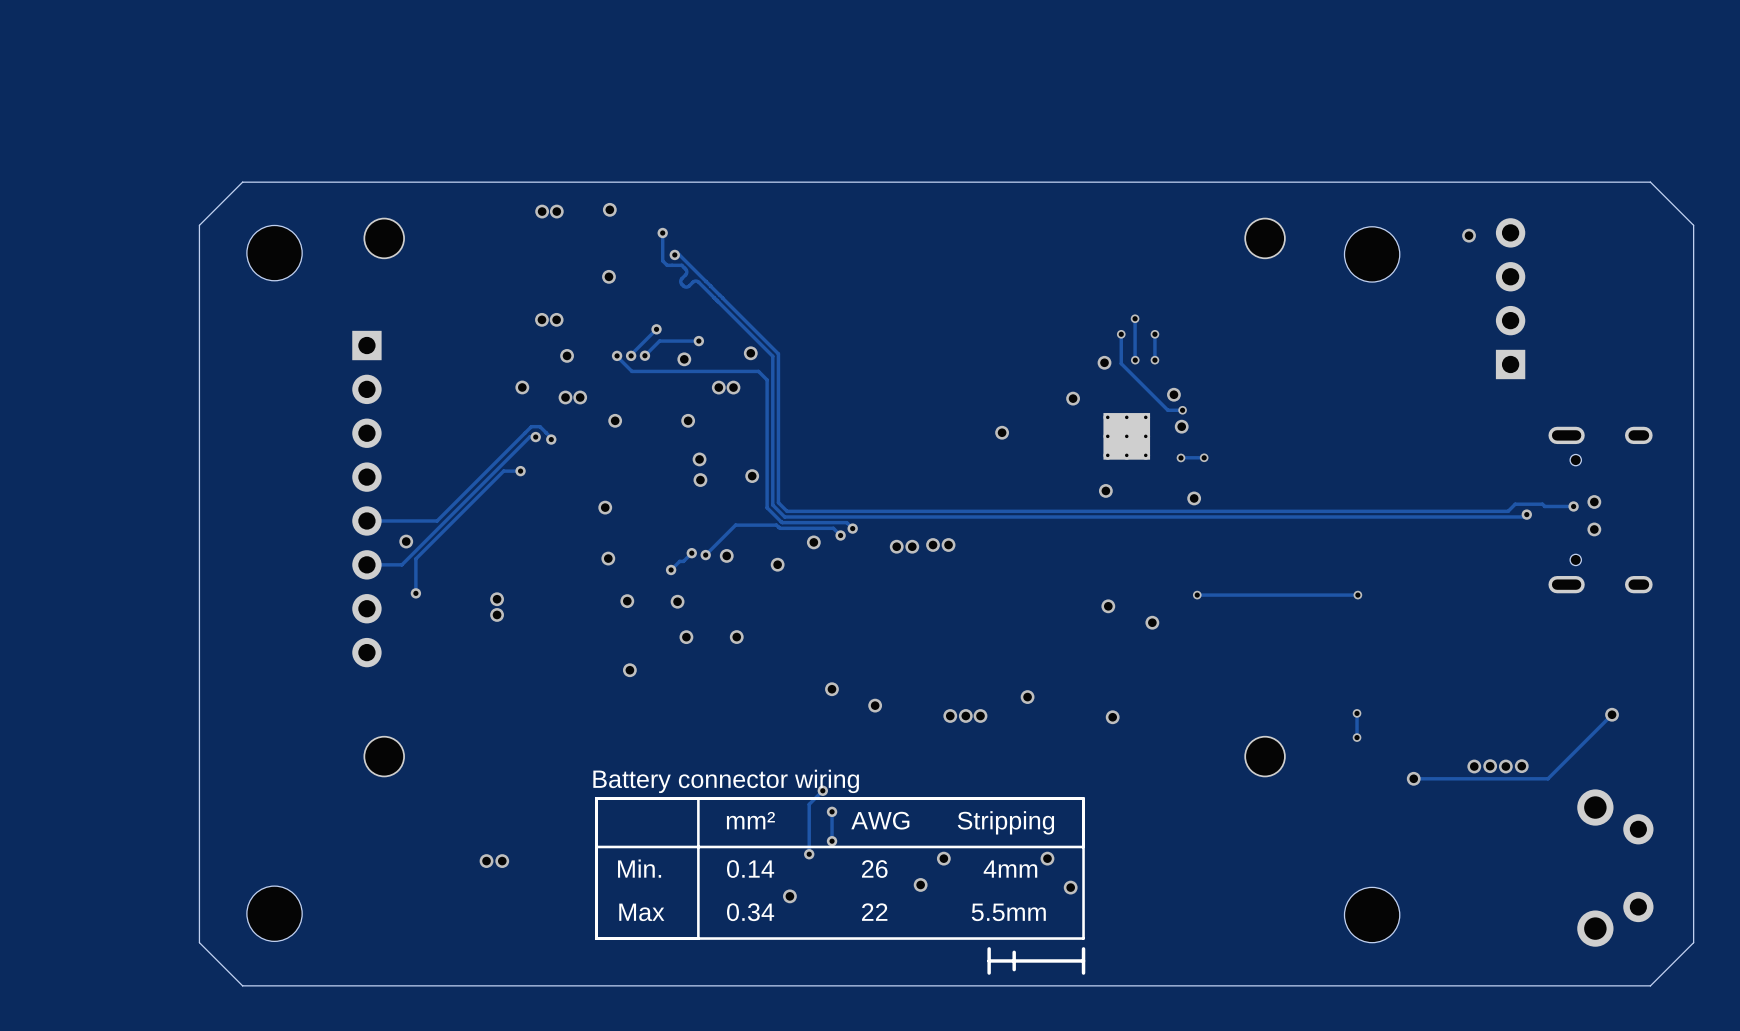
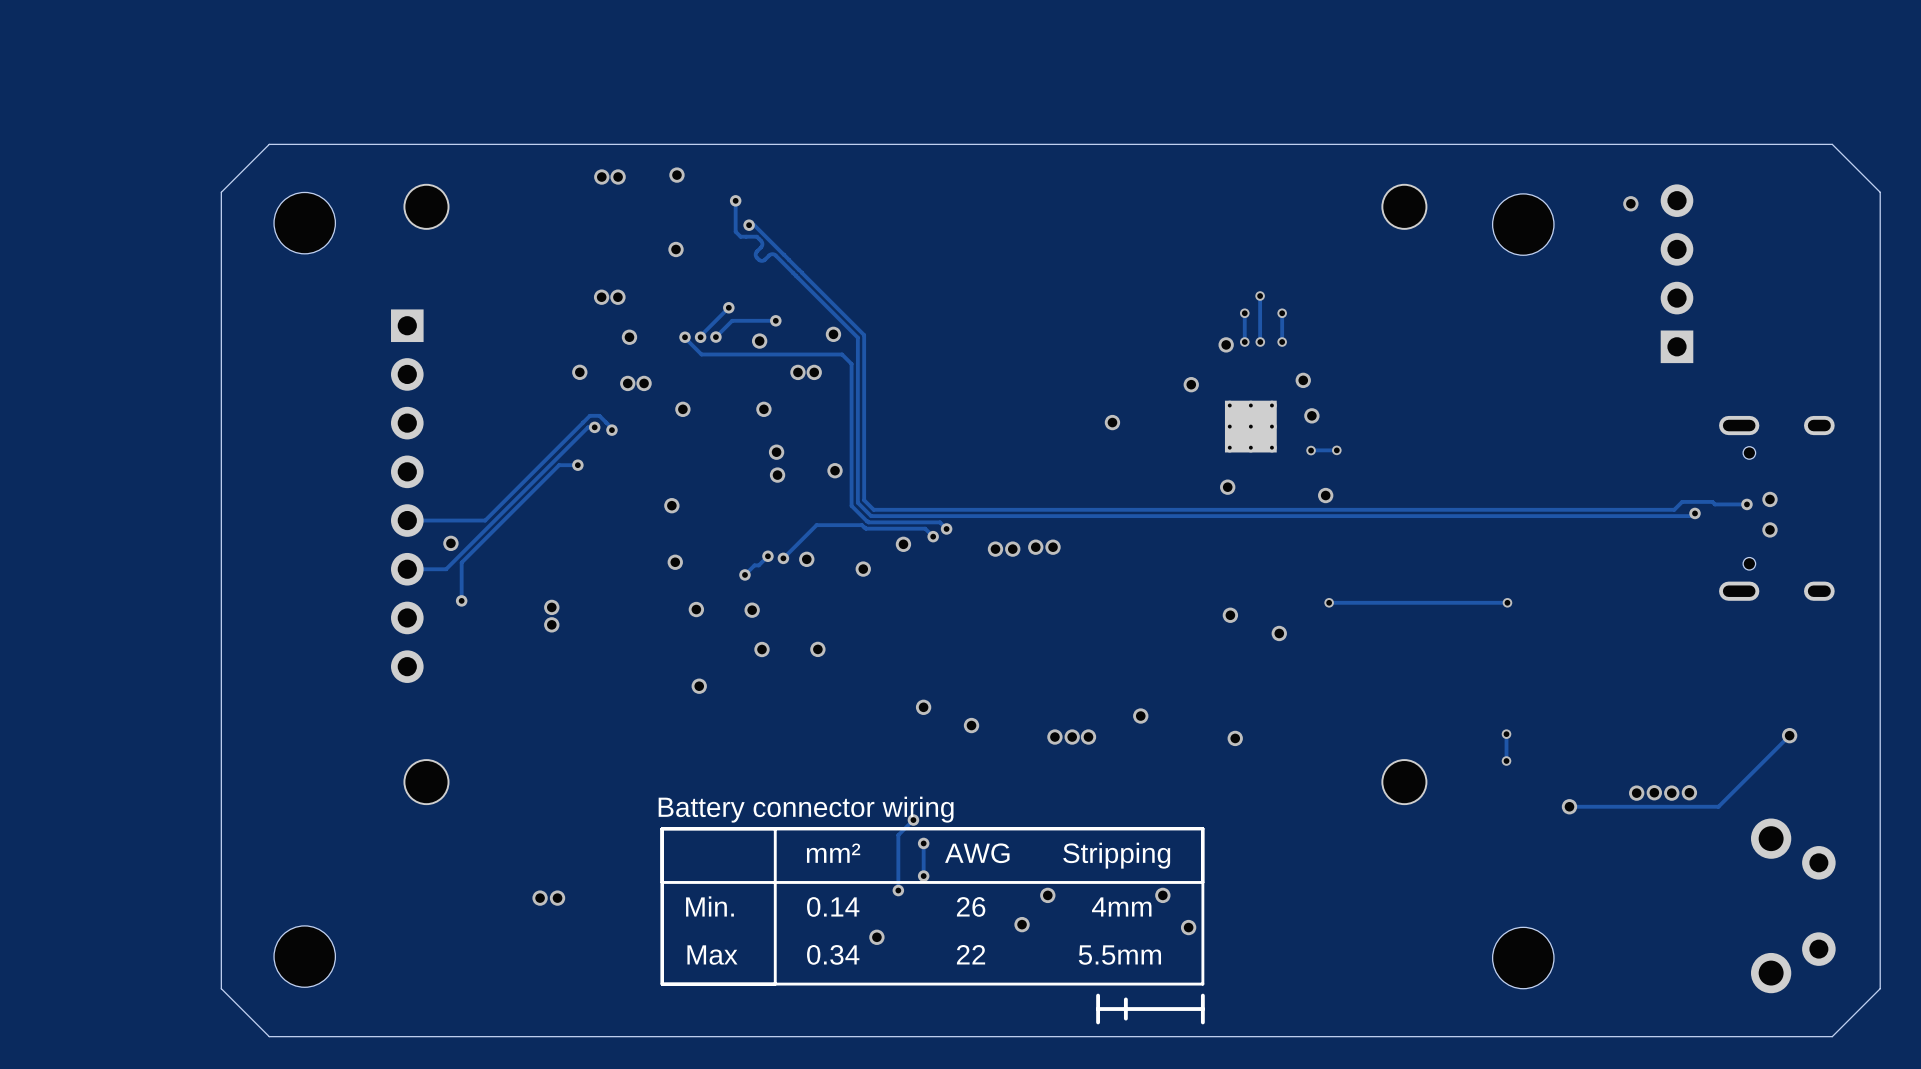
track: (1121, 360) (1121, 363) (1167, 410) (1182, 410) -> none
via position: (1182, 410) -> (1244, 342)

